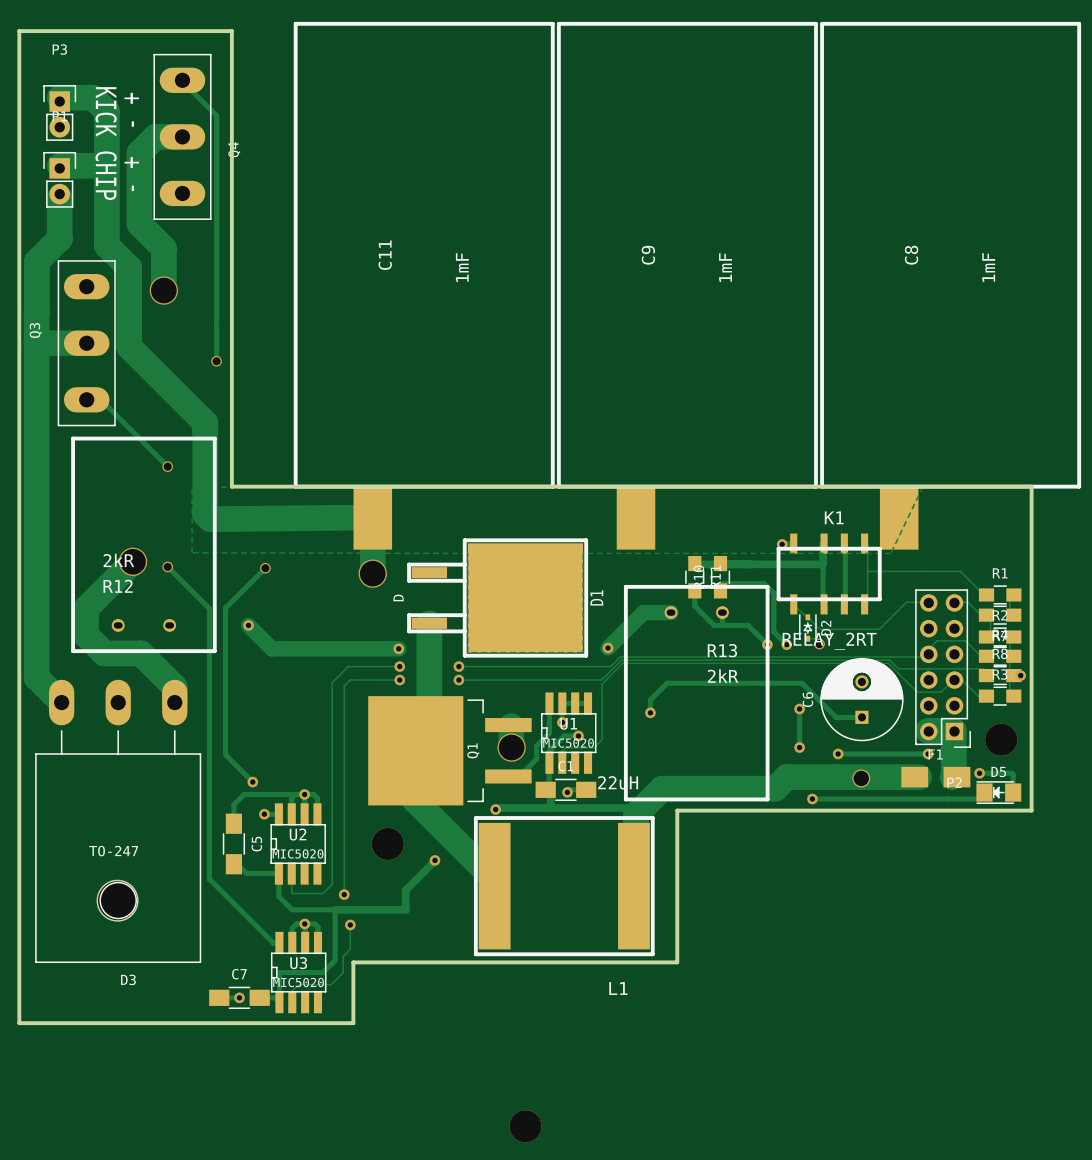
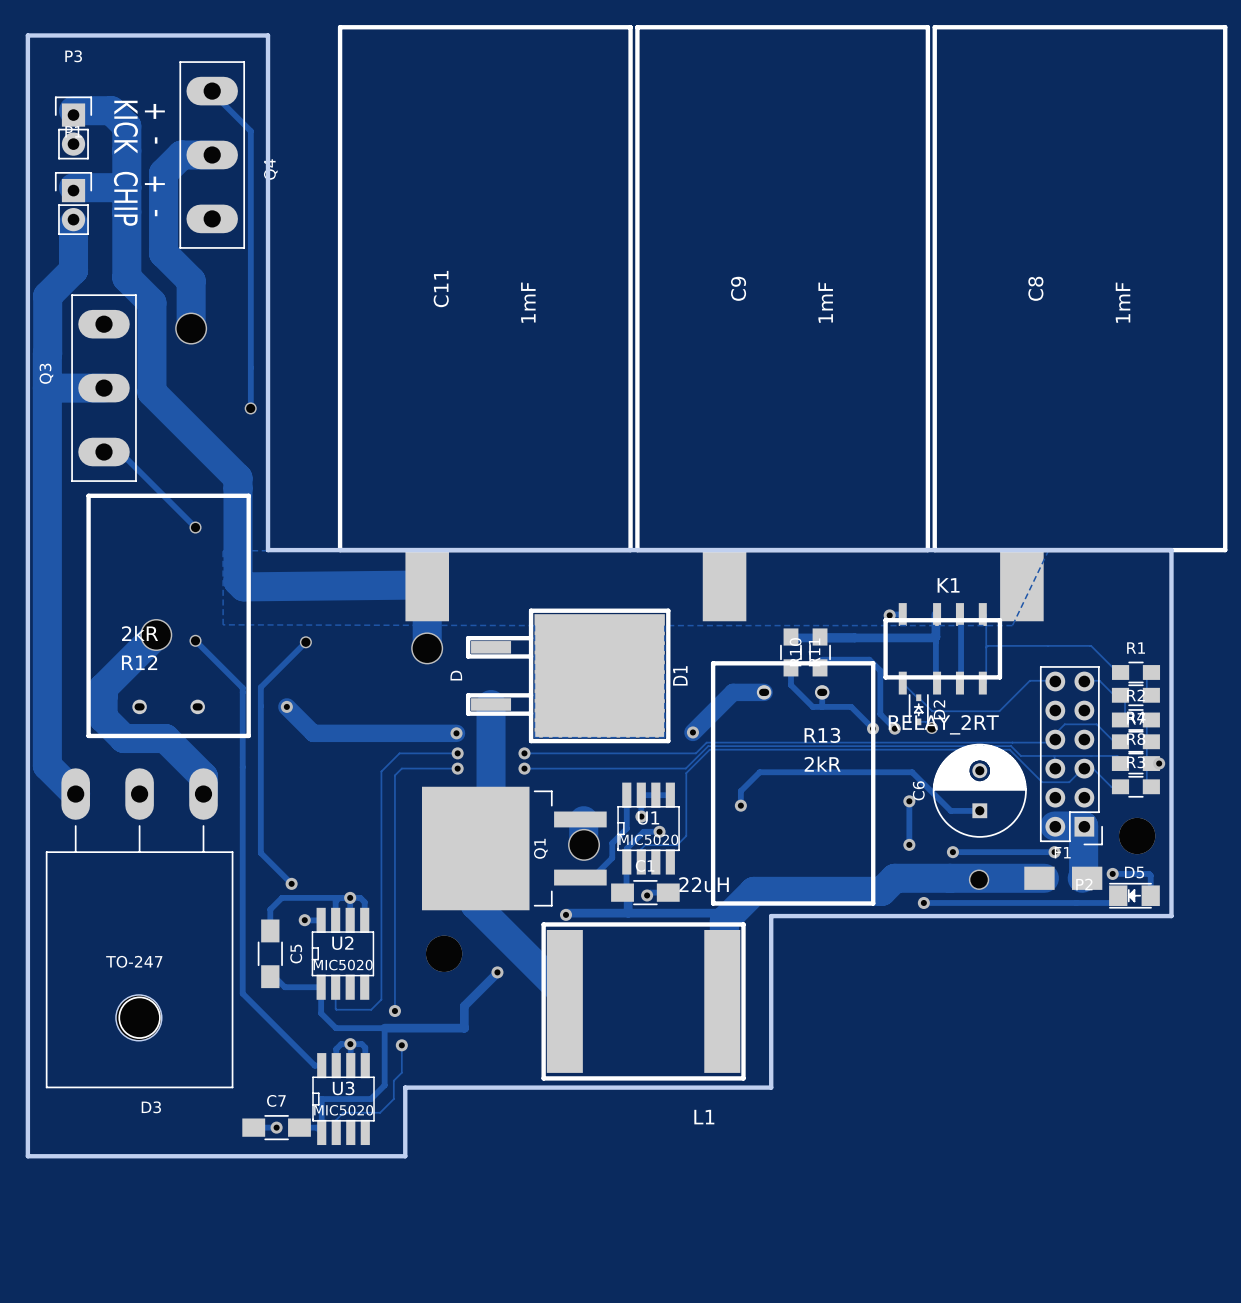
part: (525, 1126) -> none

